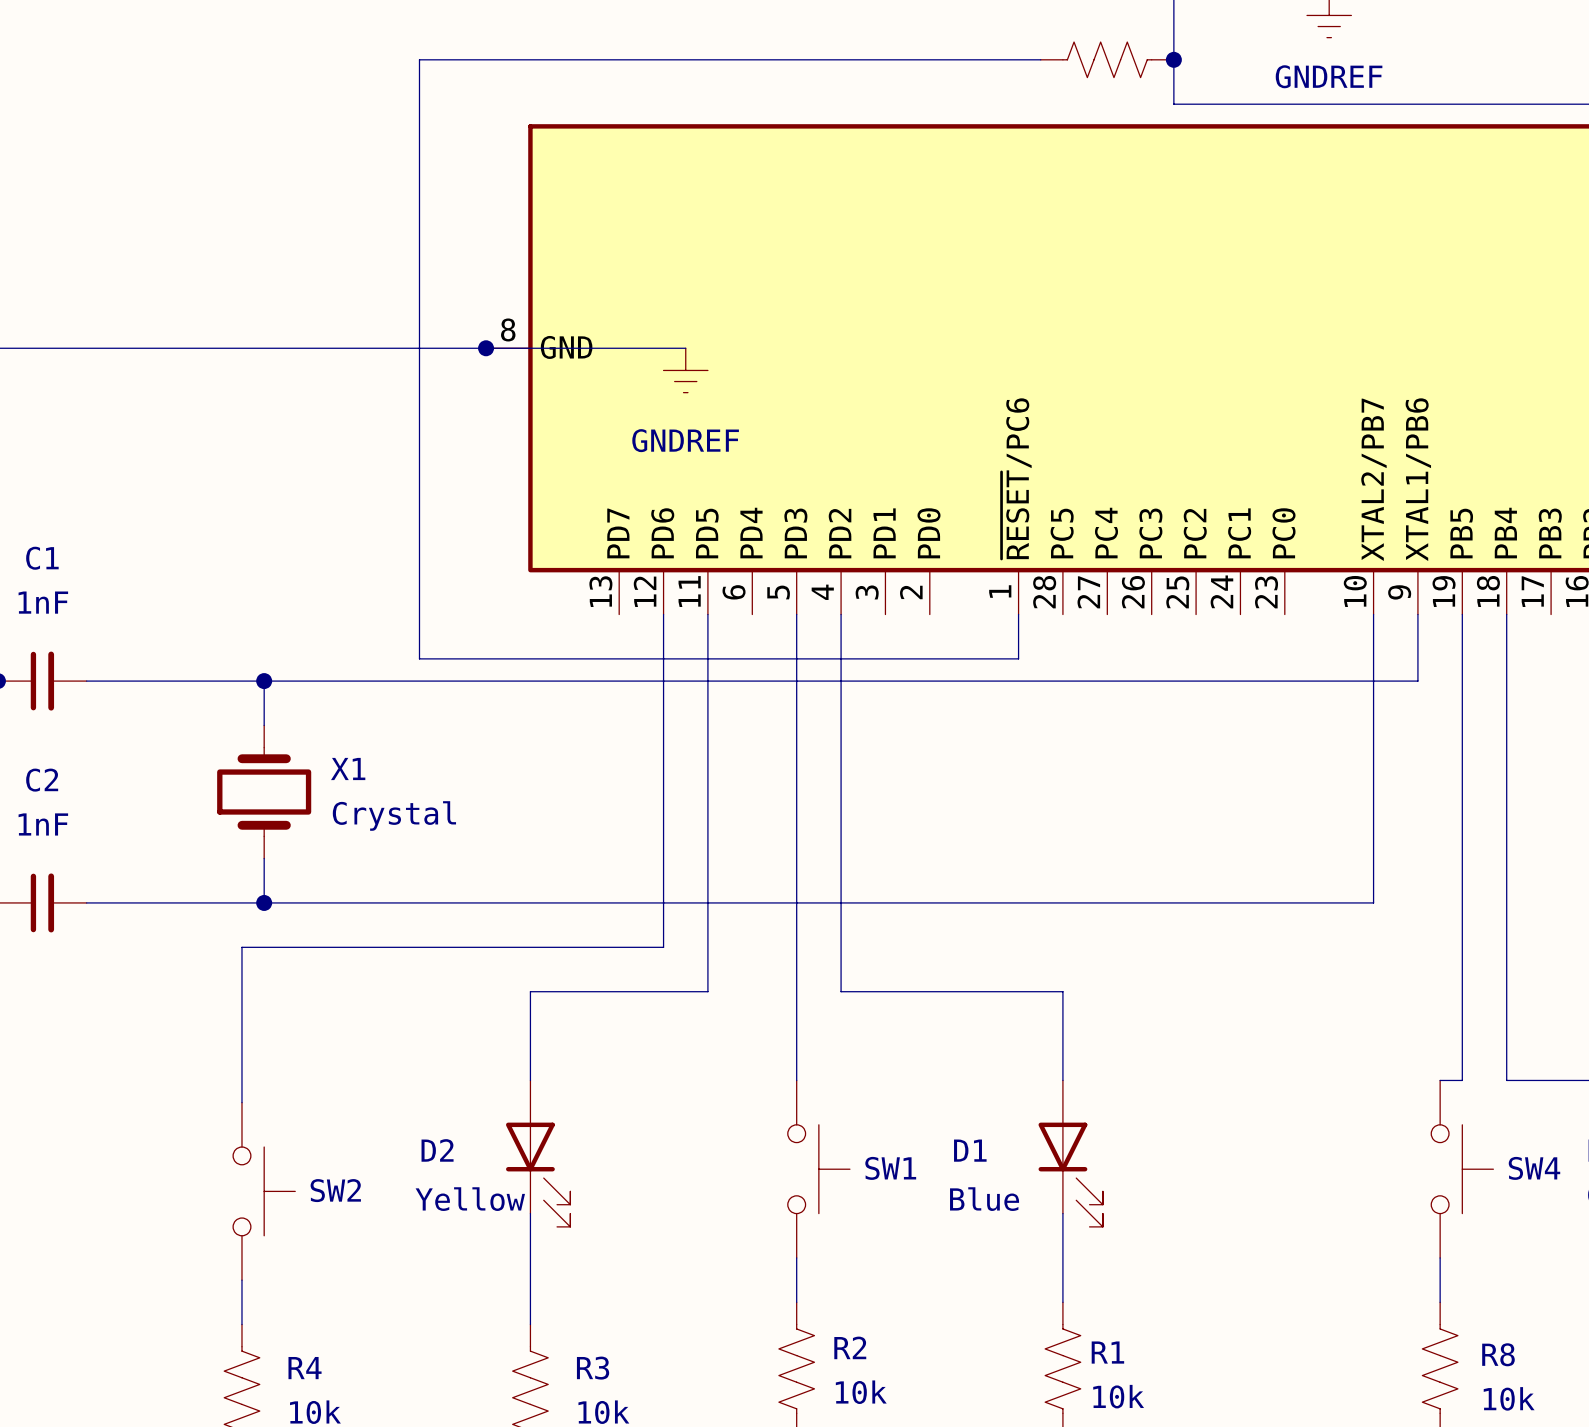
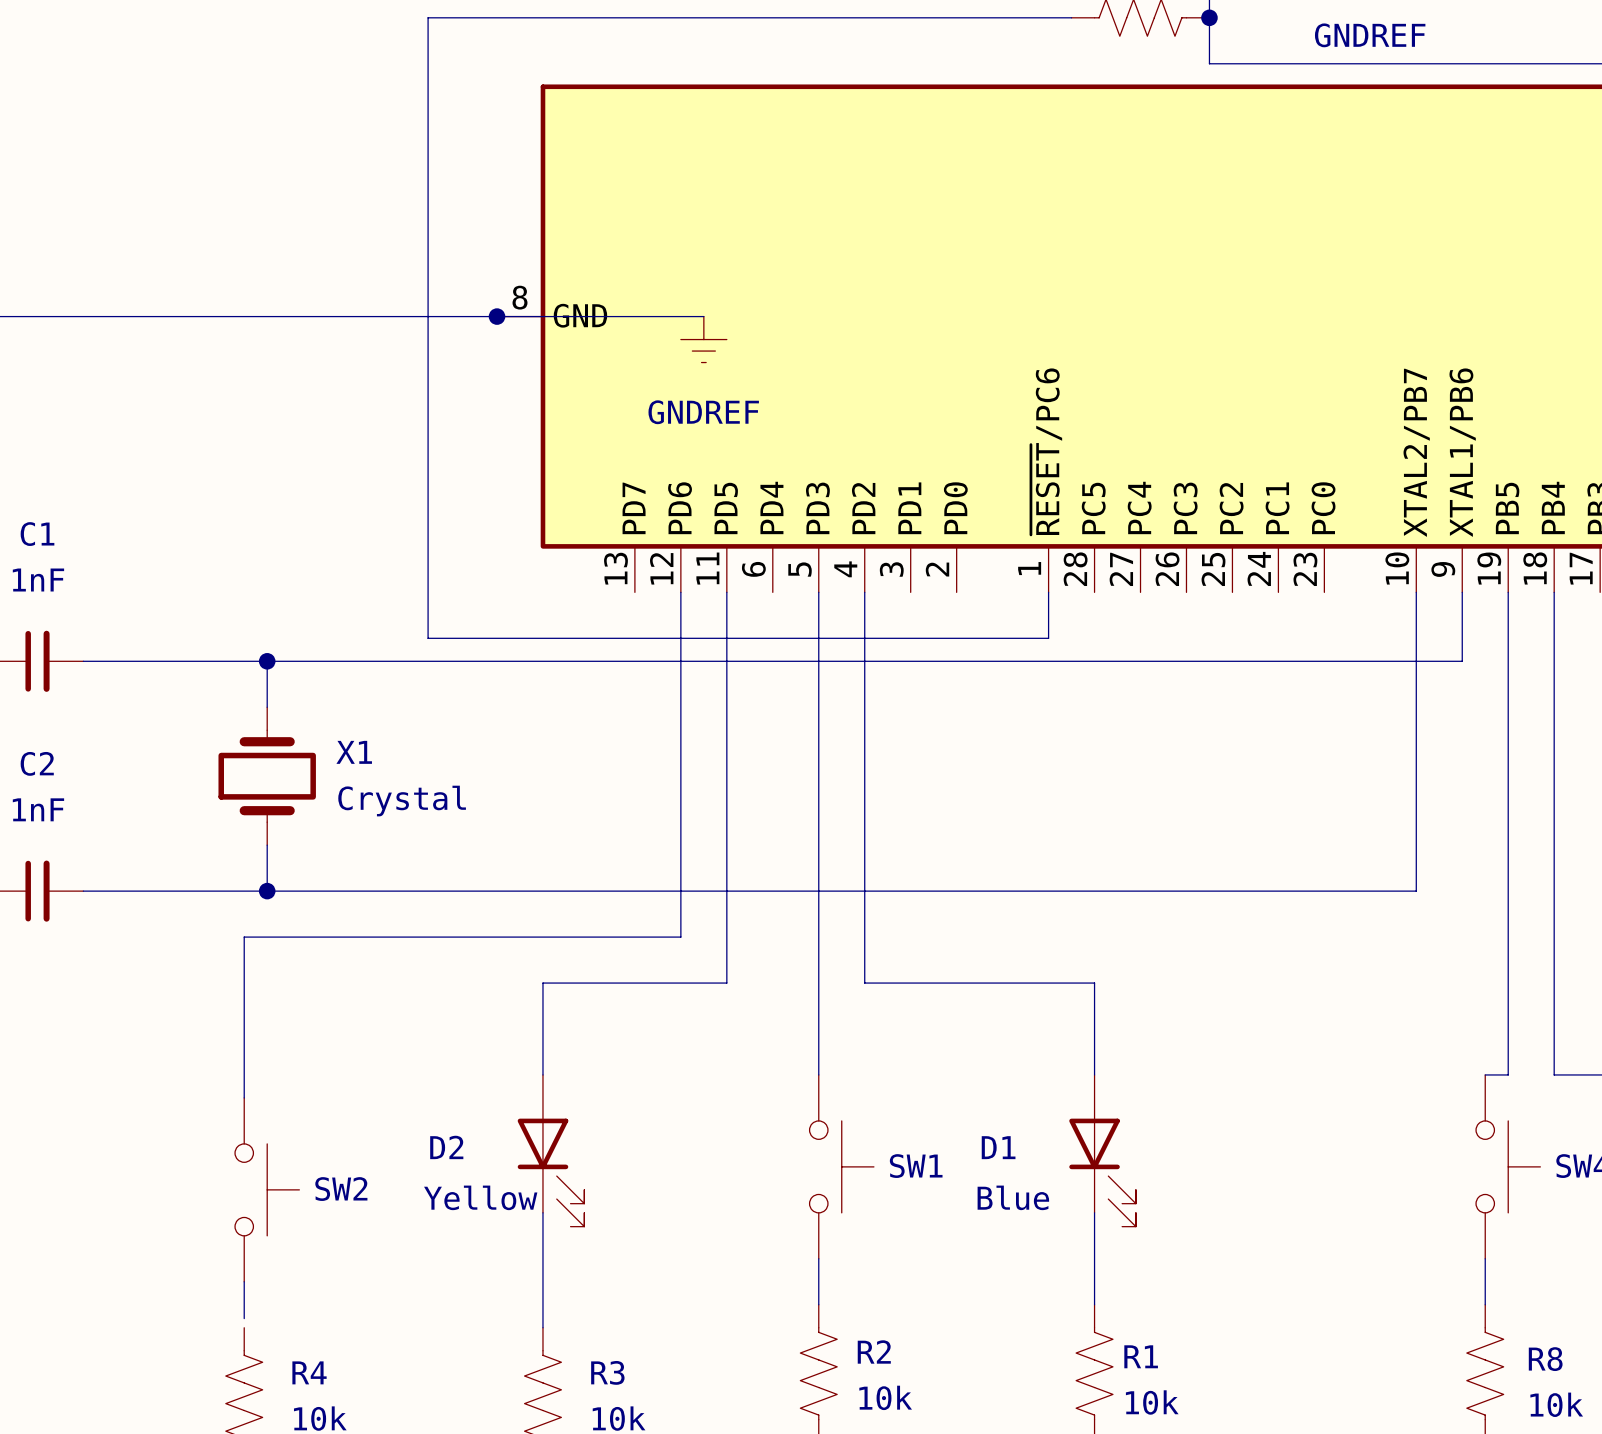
wire: (241, 1315) (241, 1324) -> none

